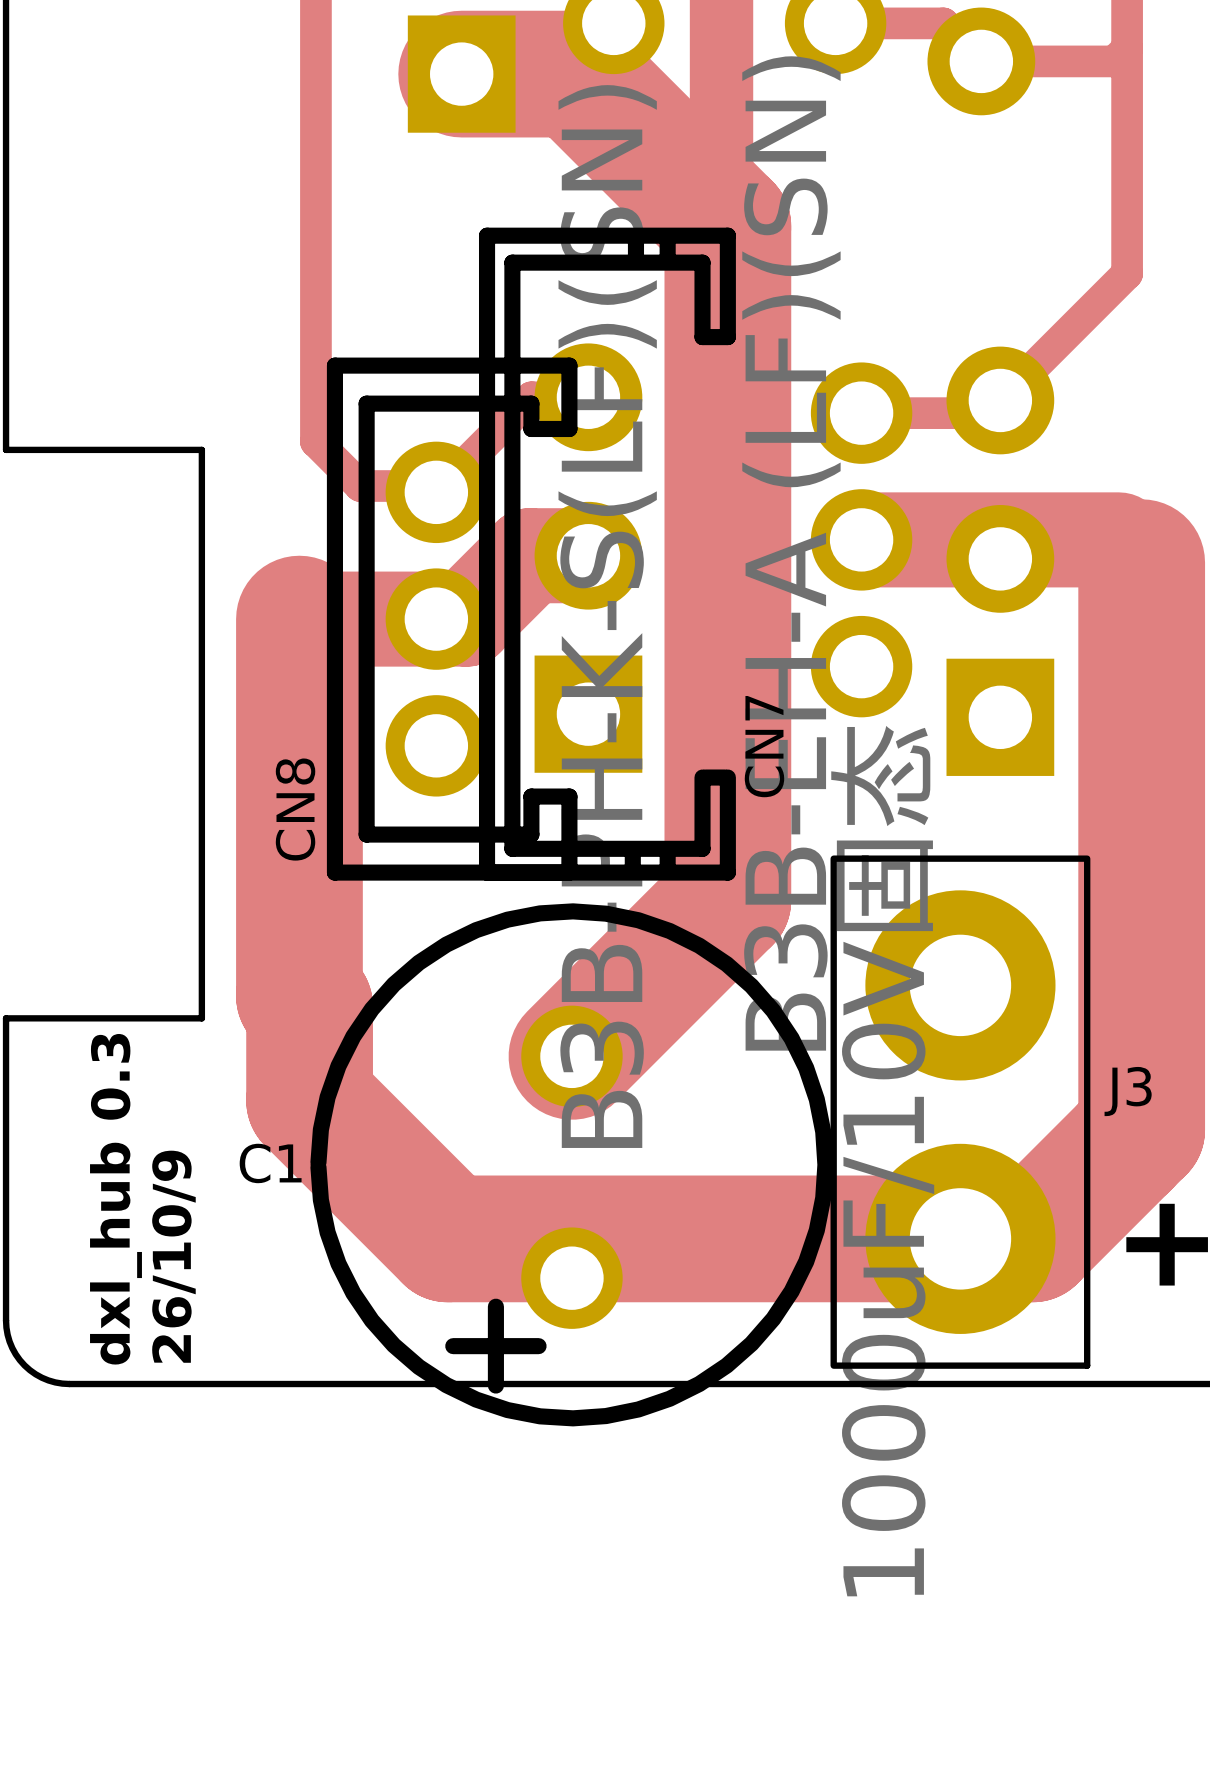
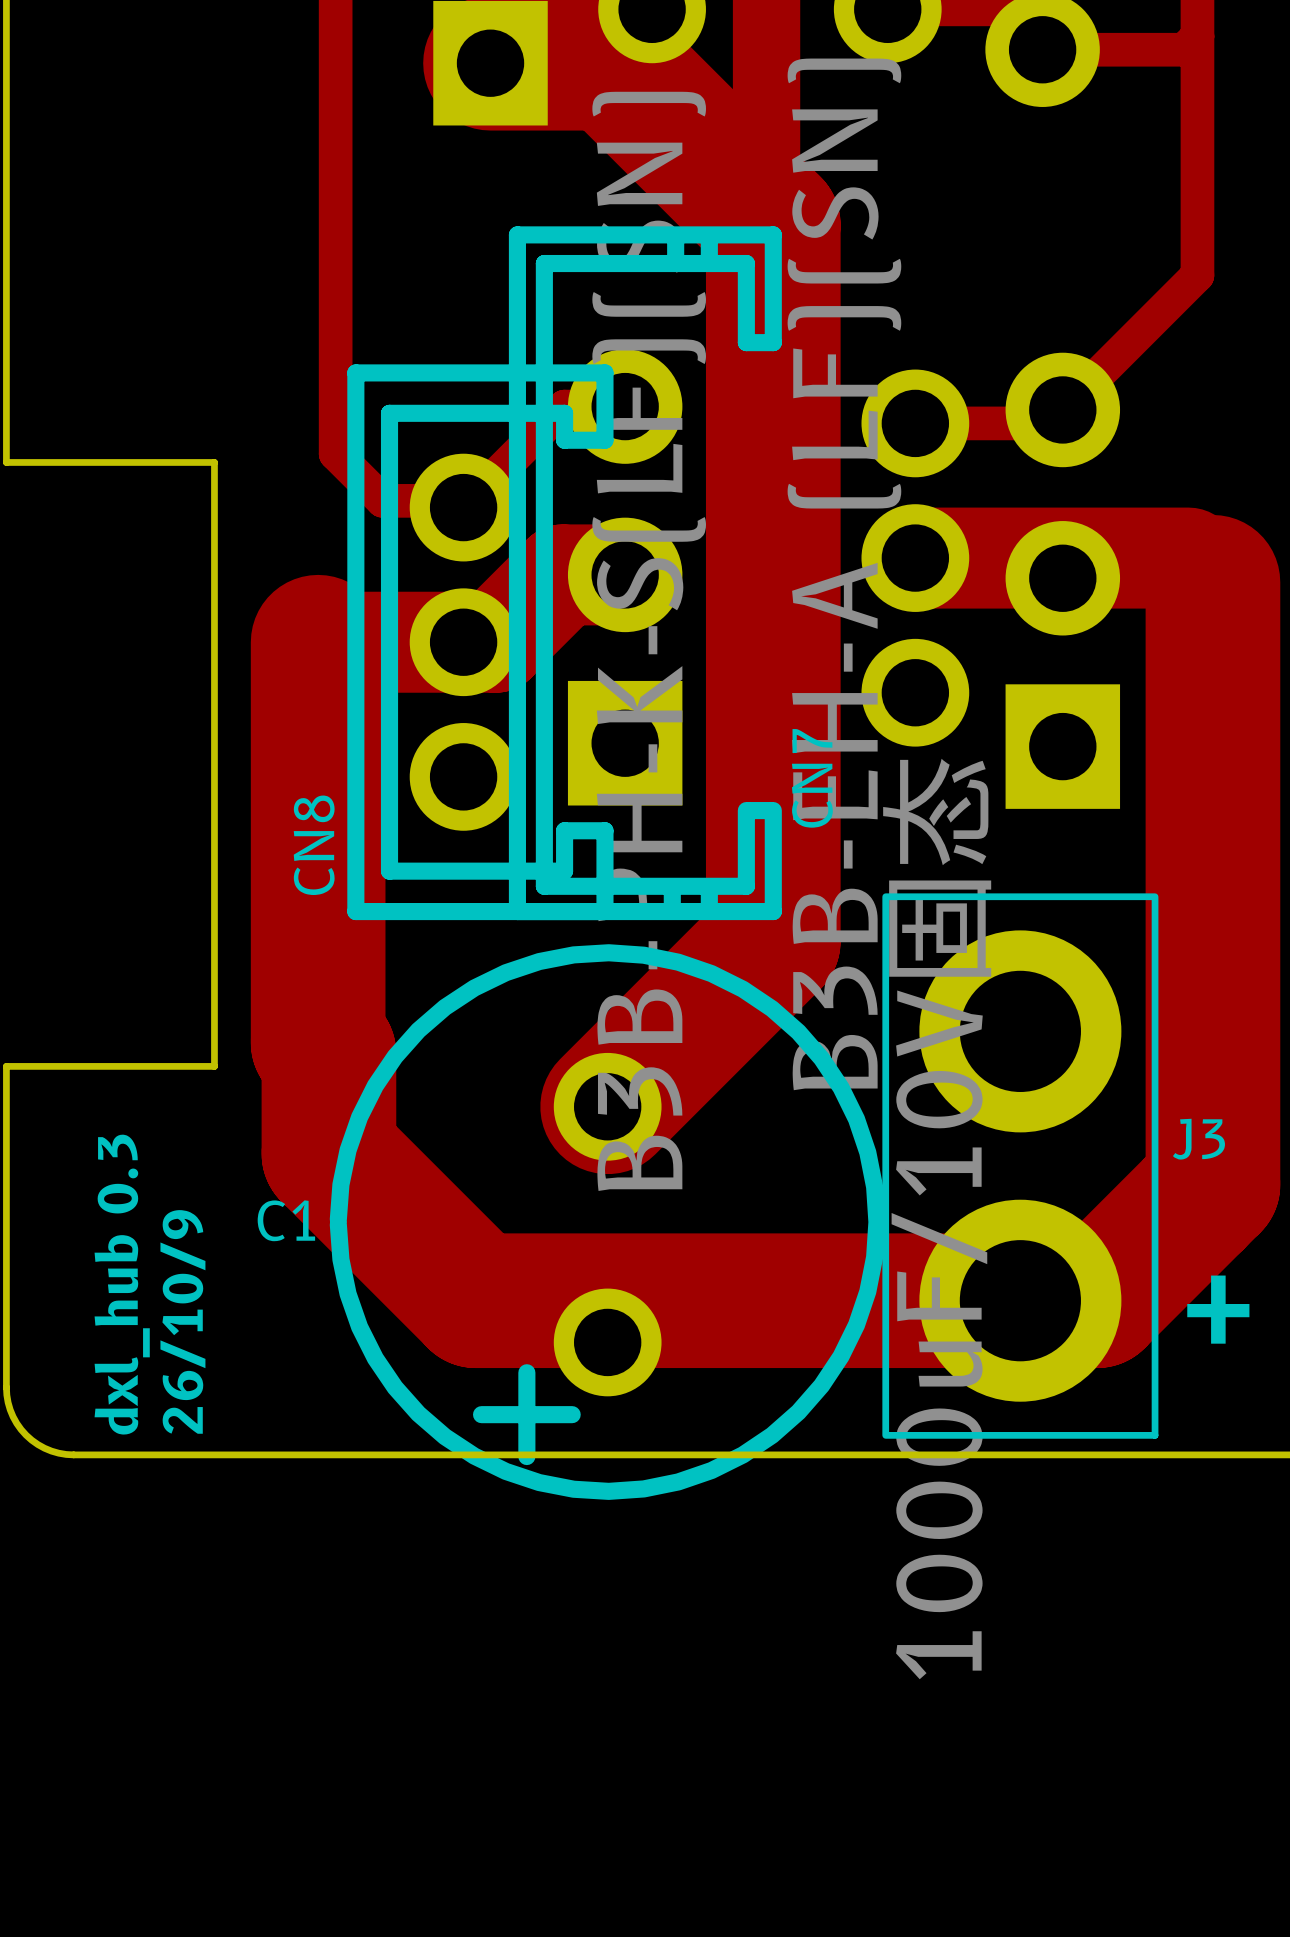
J3 footprint: [830, 855, 1091, 1369] -> [882, 893, 1159, 1439]

